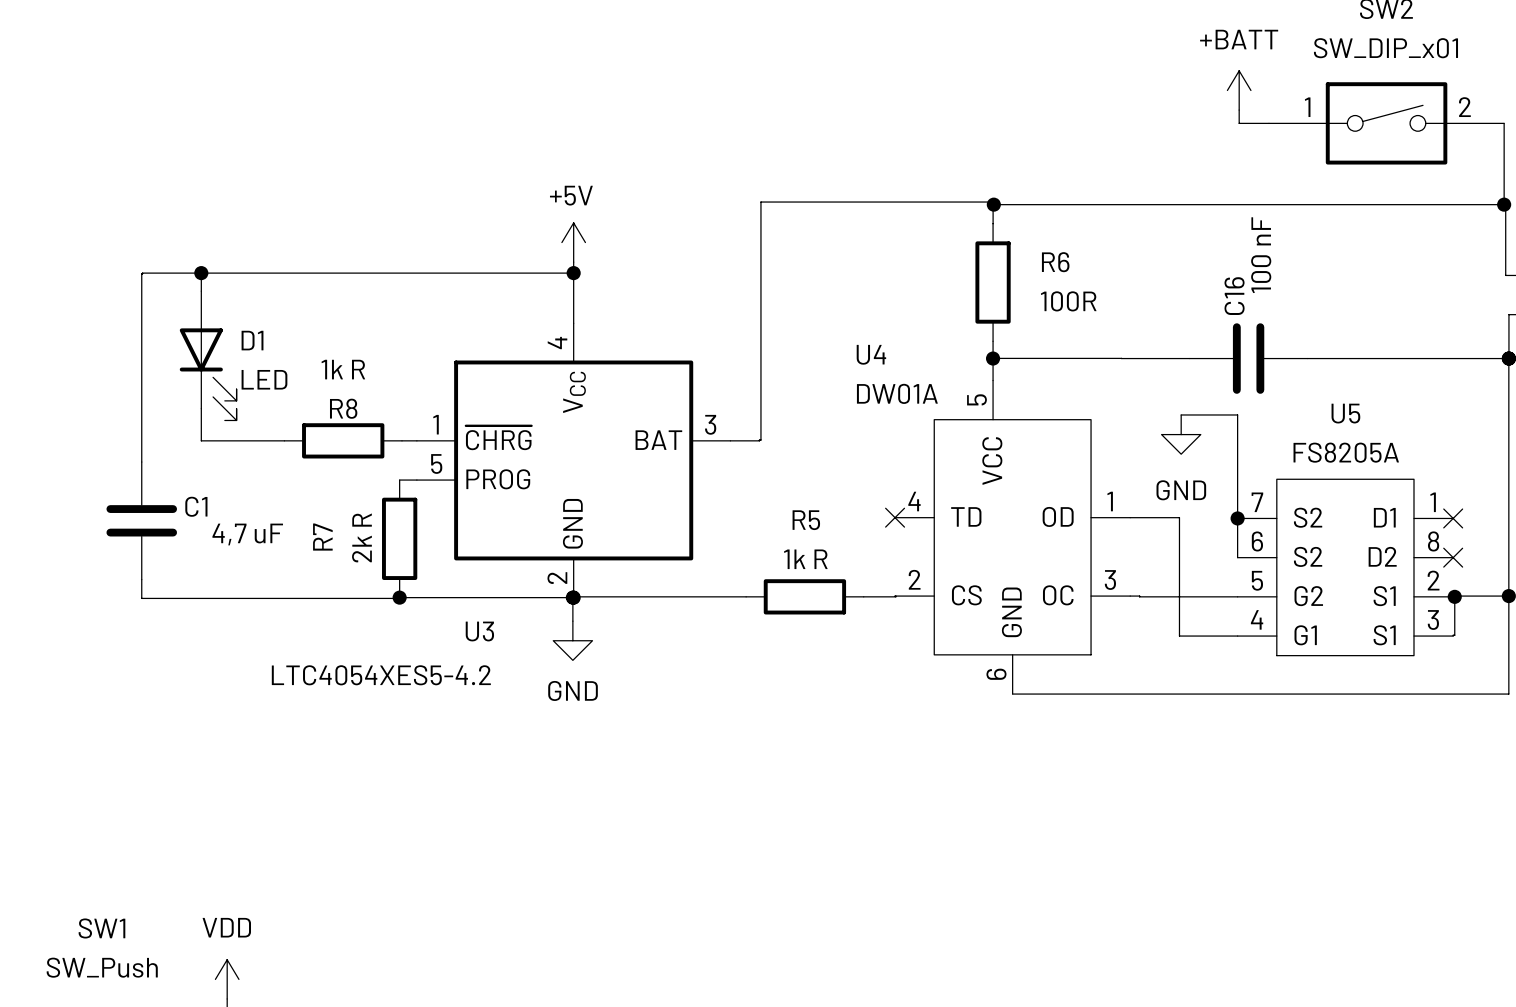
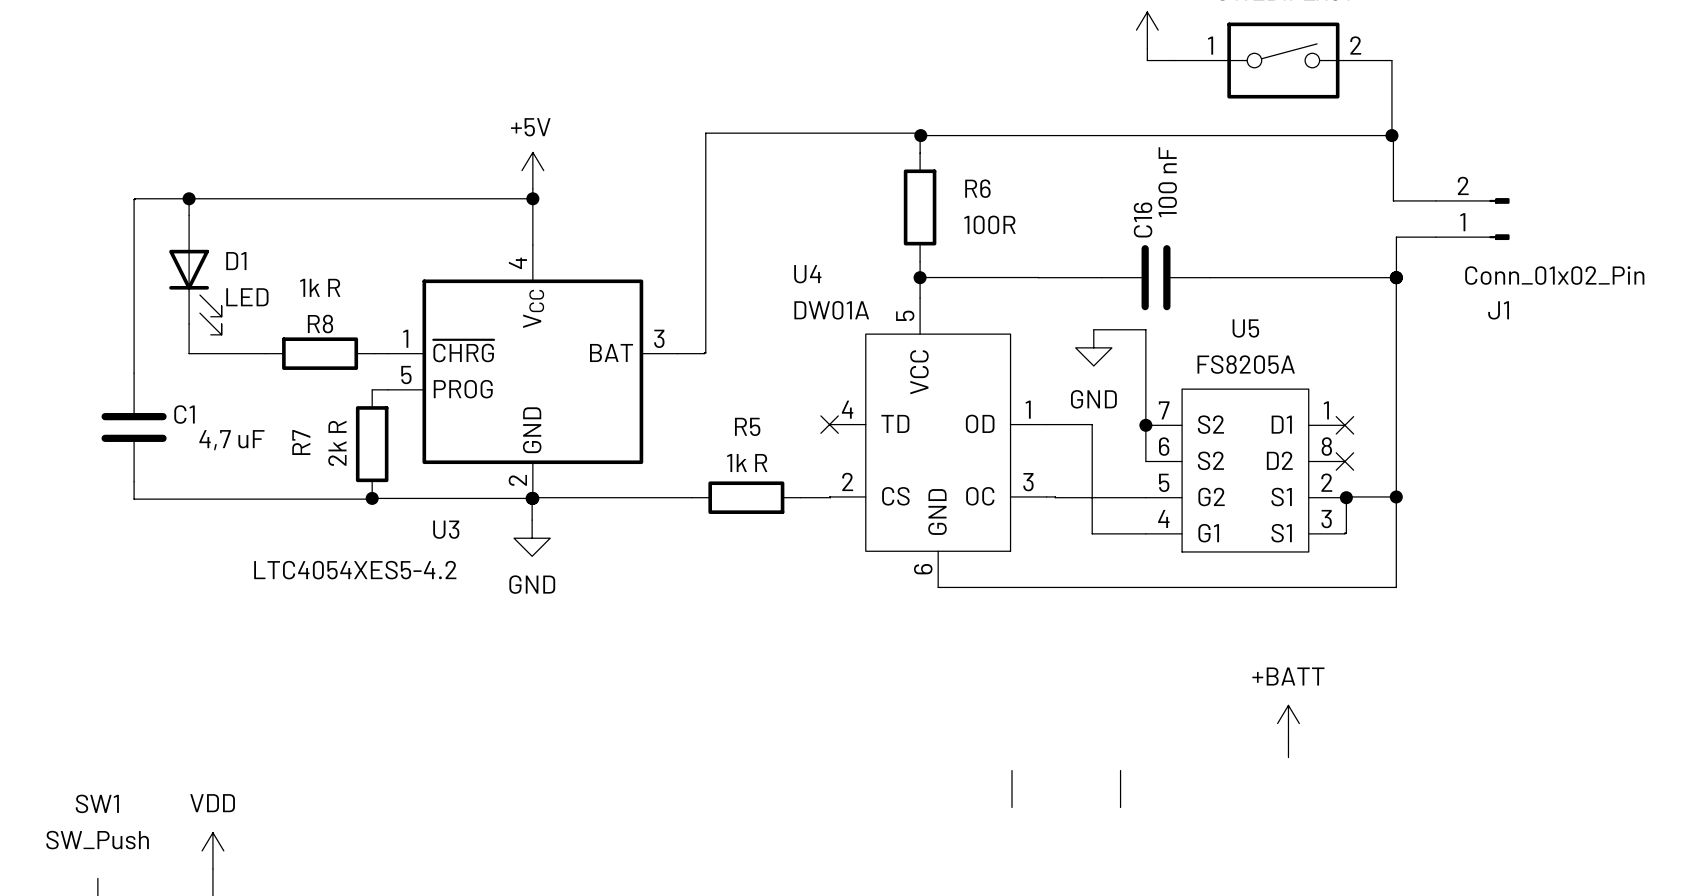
power symbol: none -> +BATT (1288, 723)
wire: none -> (1288, 741) (1288, 757)
wire: none -> (1011, 770) (1011, 807)
wire: none -> (1120, 770) (1120, 807)

